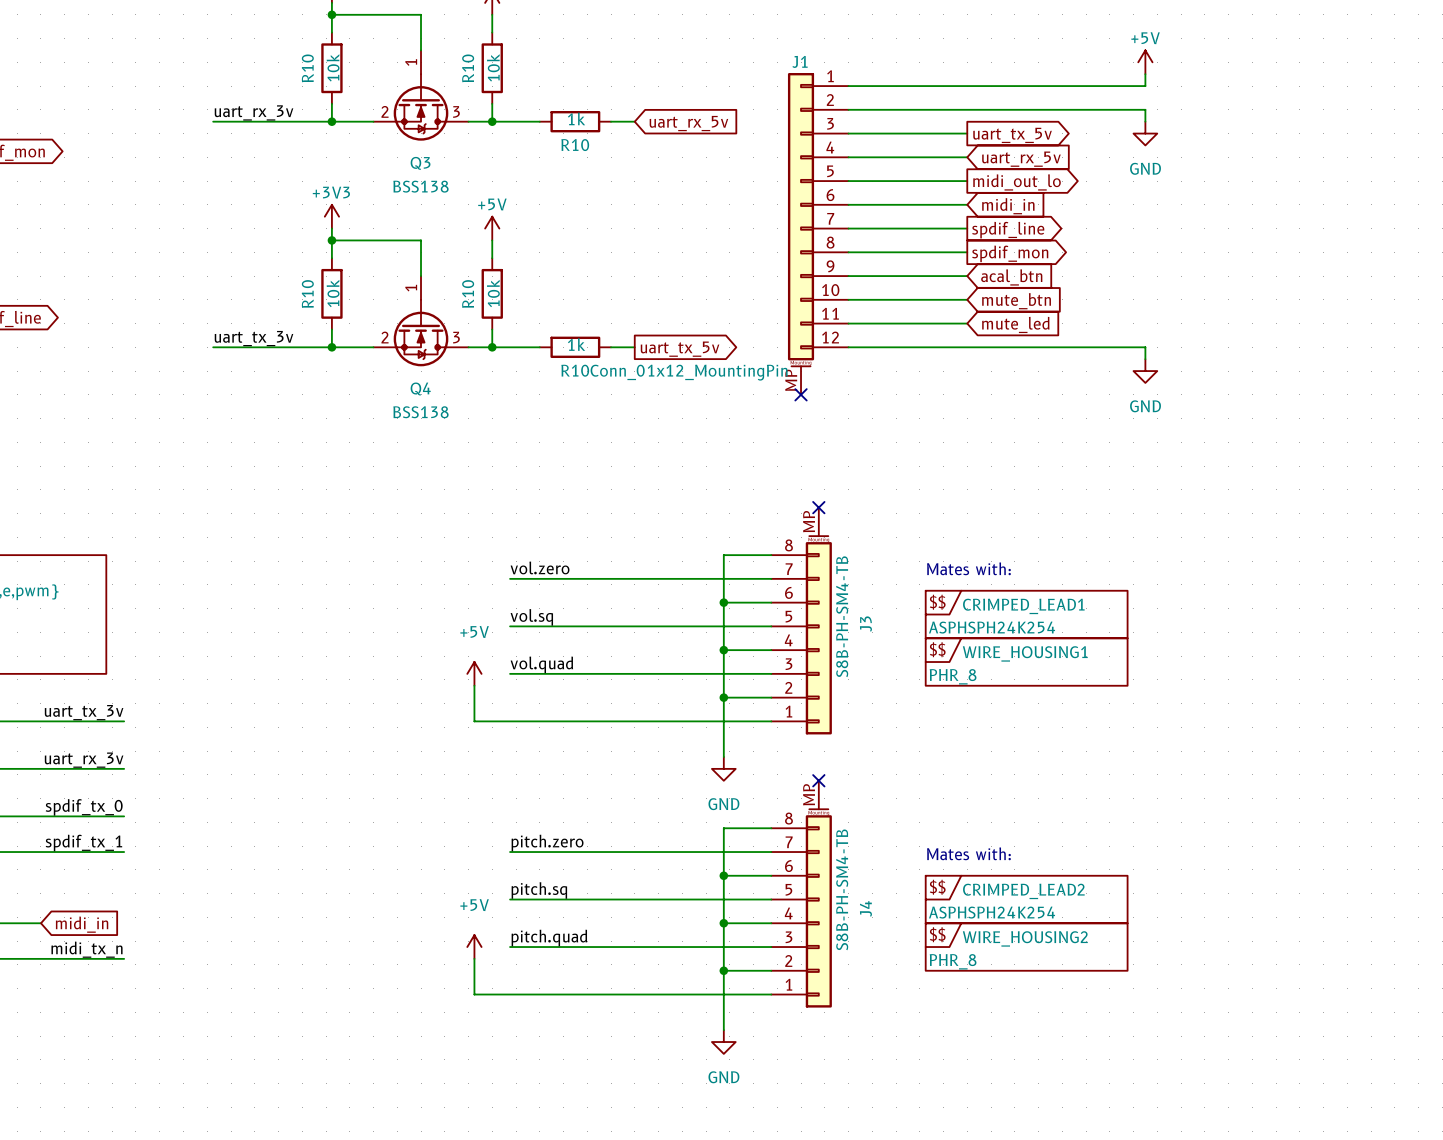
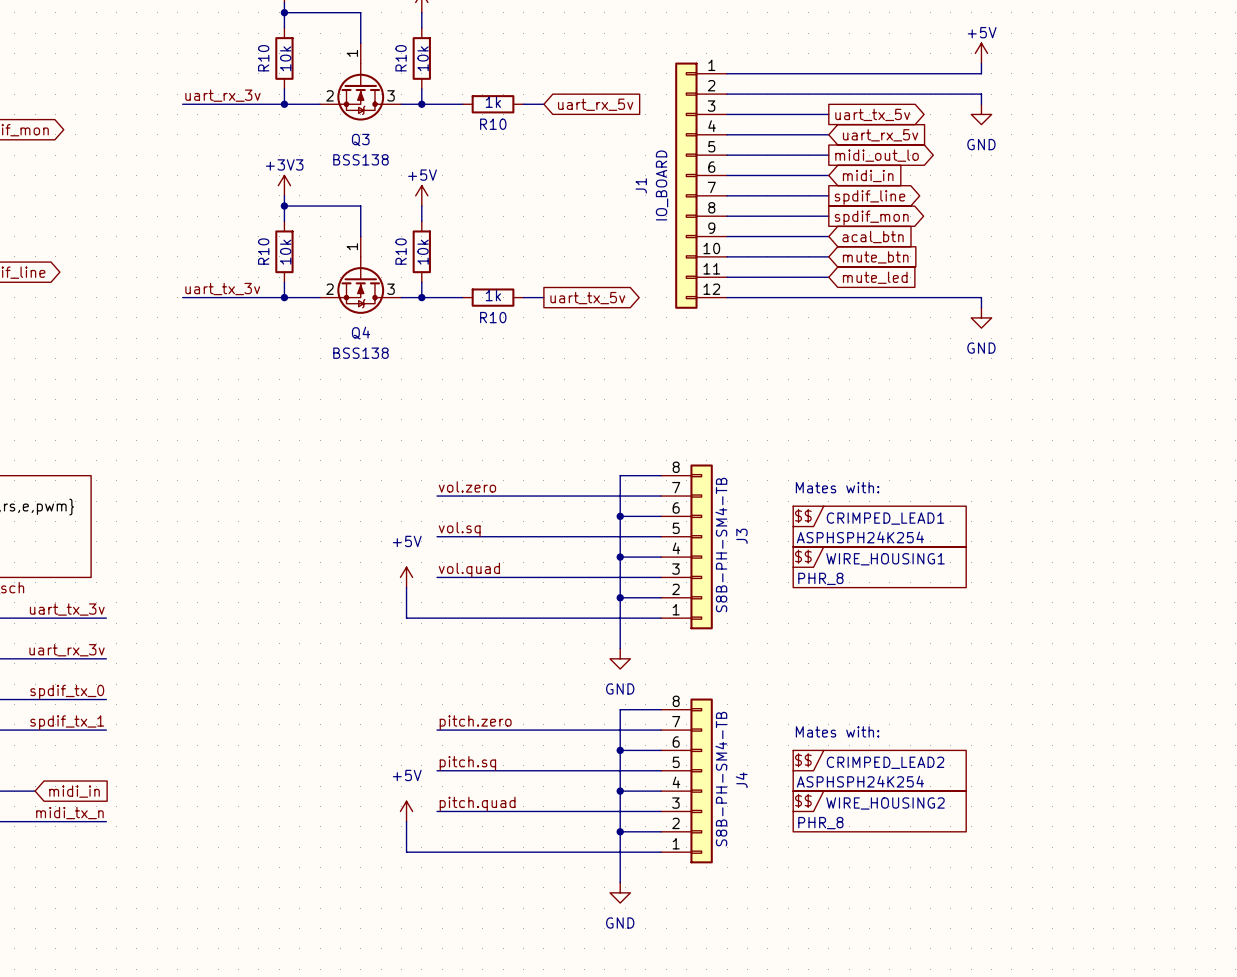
J1 name position: J1 (800, 61) -> J1 (641, 185)
J1 symbol: [787, 72, 849, 395] -> [675, 62, 728, 309]
J1 value: Conn_01x12_MountingPin (689, 372) -> IO_BOARD (662, 185)
no-connect mark: (801, 394) -> none
J3 symbol: [771, 507, 832, 735] -> [660, 464, 713, 630]
no-connect mark: (818, 507) -> none
J4 symbol: [771, 780, 832, 1008] -> [660, 698, 713, 864]
no-connect mark: (818, 780) -> none

